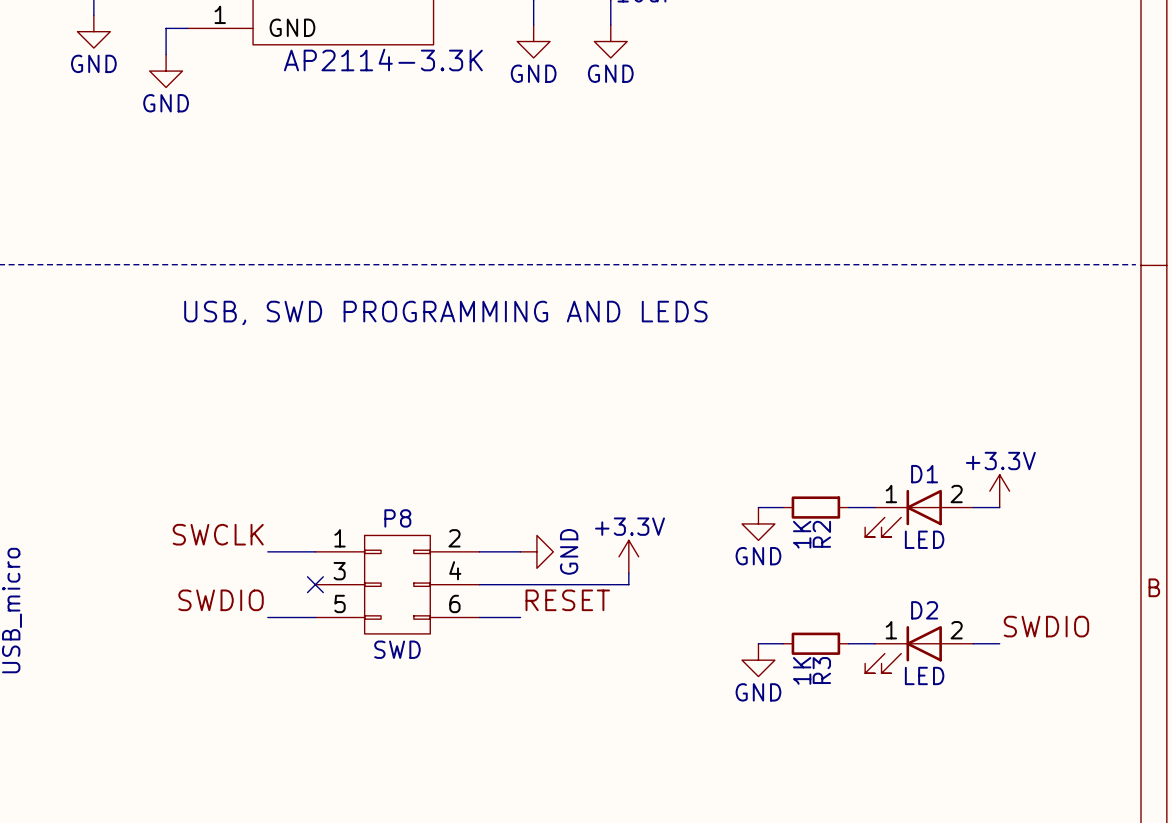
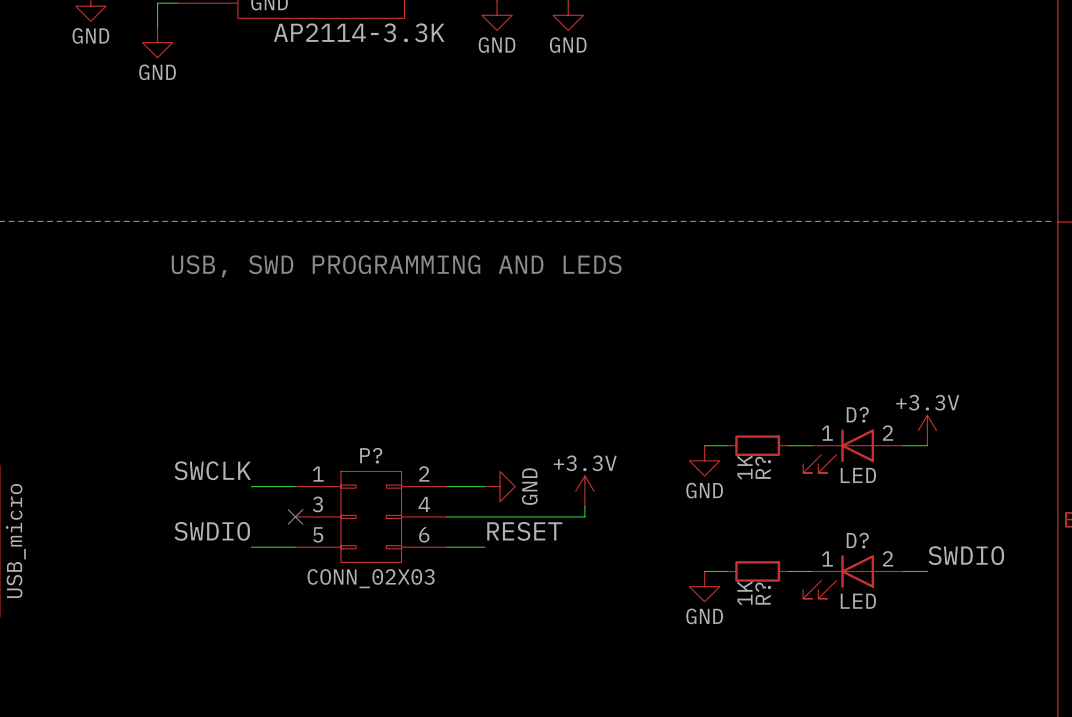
D1 name: D1 (924, 474) -> D? (857, 414)
P8 name: P8 (397, 518) -> P? (371, 455)
R2 name: R2 (821, 534) -> R? (763, 467)
D2 name: D2 (924, 610) -> D? (857, 540)
P8 value: SWD (397, 649) -> CONN_02X03 (371, 578)
R3 name: R3 (821, 670) -> R? (763, 593)

